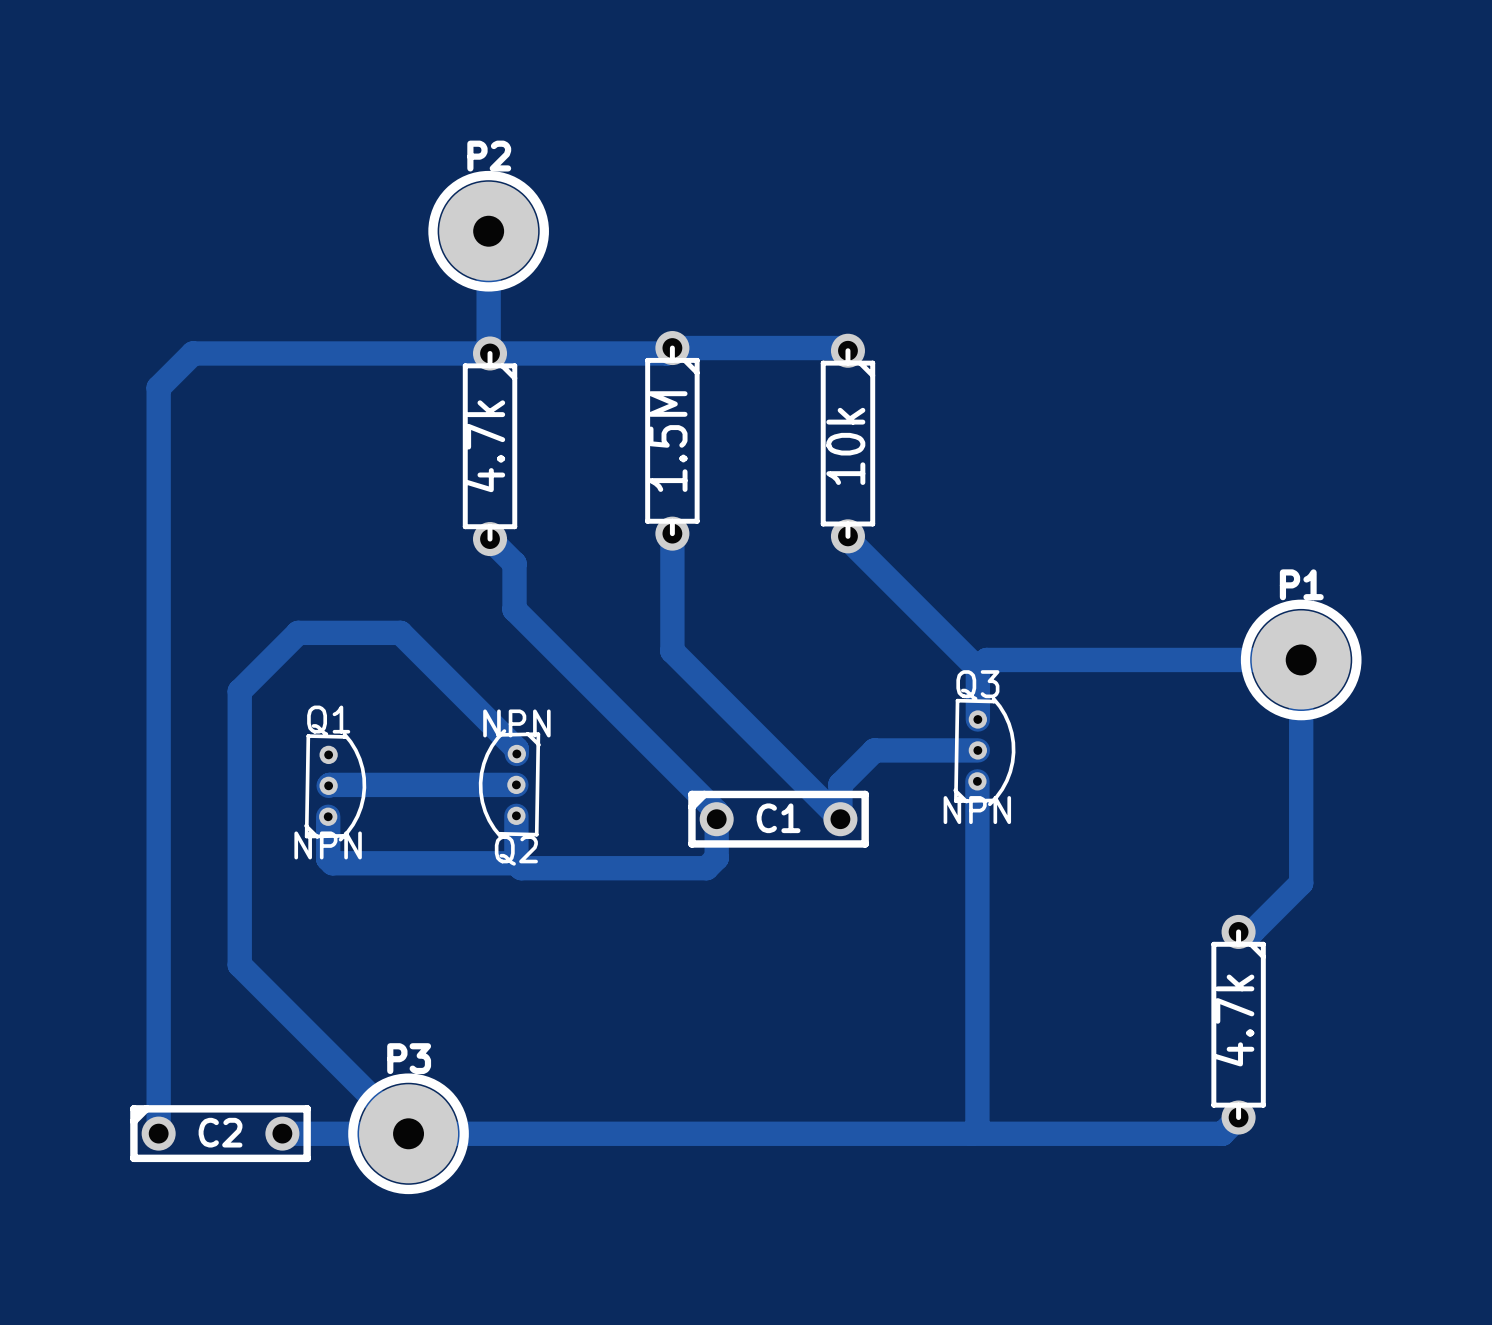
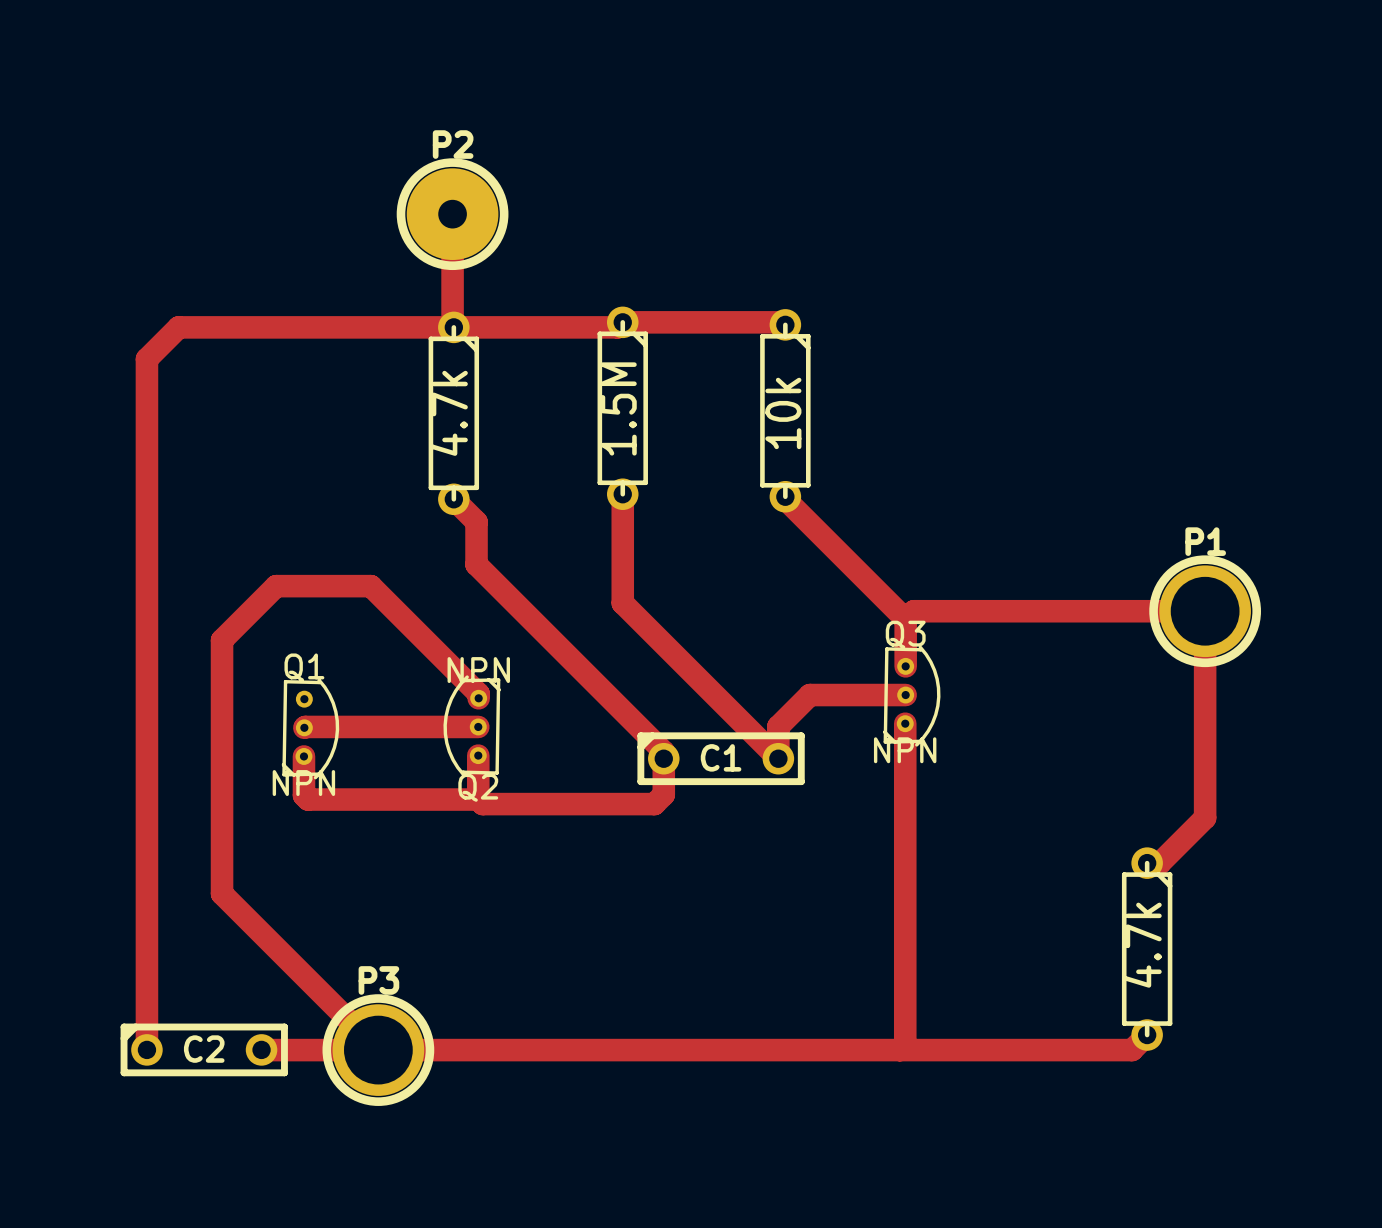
P1 footprint: [1240, 599, 1362, 721] -> [1149, 555, 1262, 668]
P3 footprint: [348, 1073, 469, 1195] -> [322, 994, 435, 1106]

